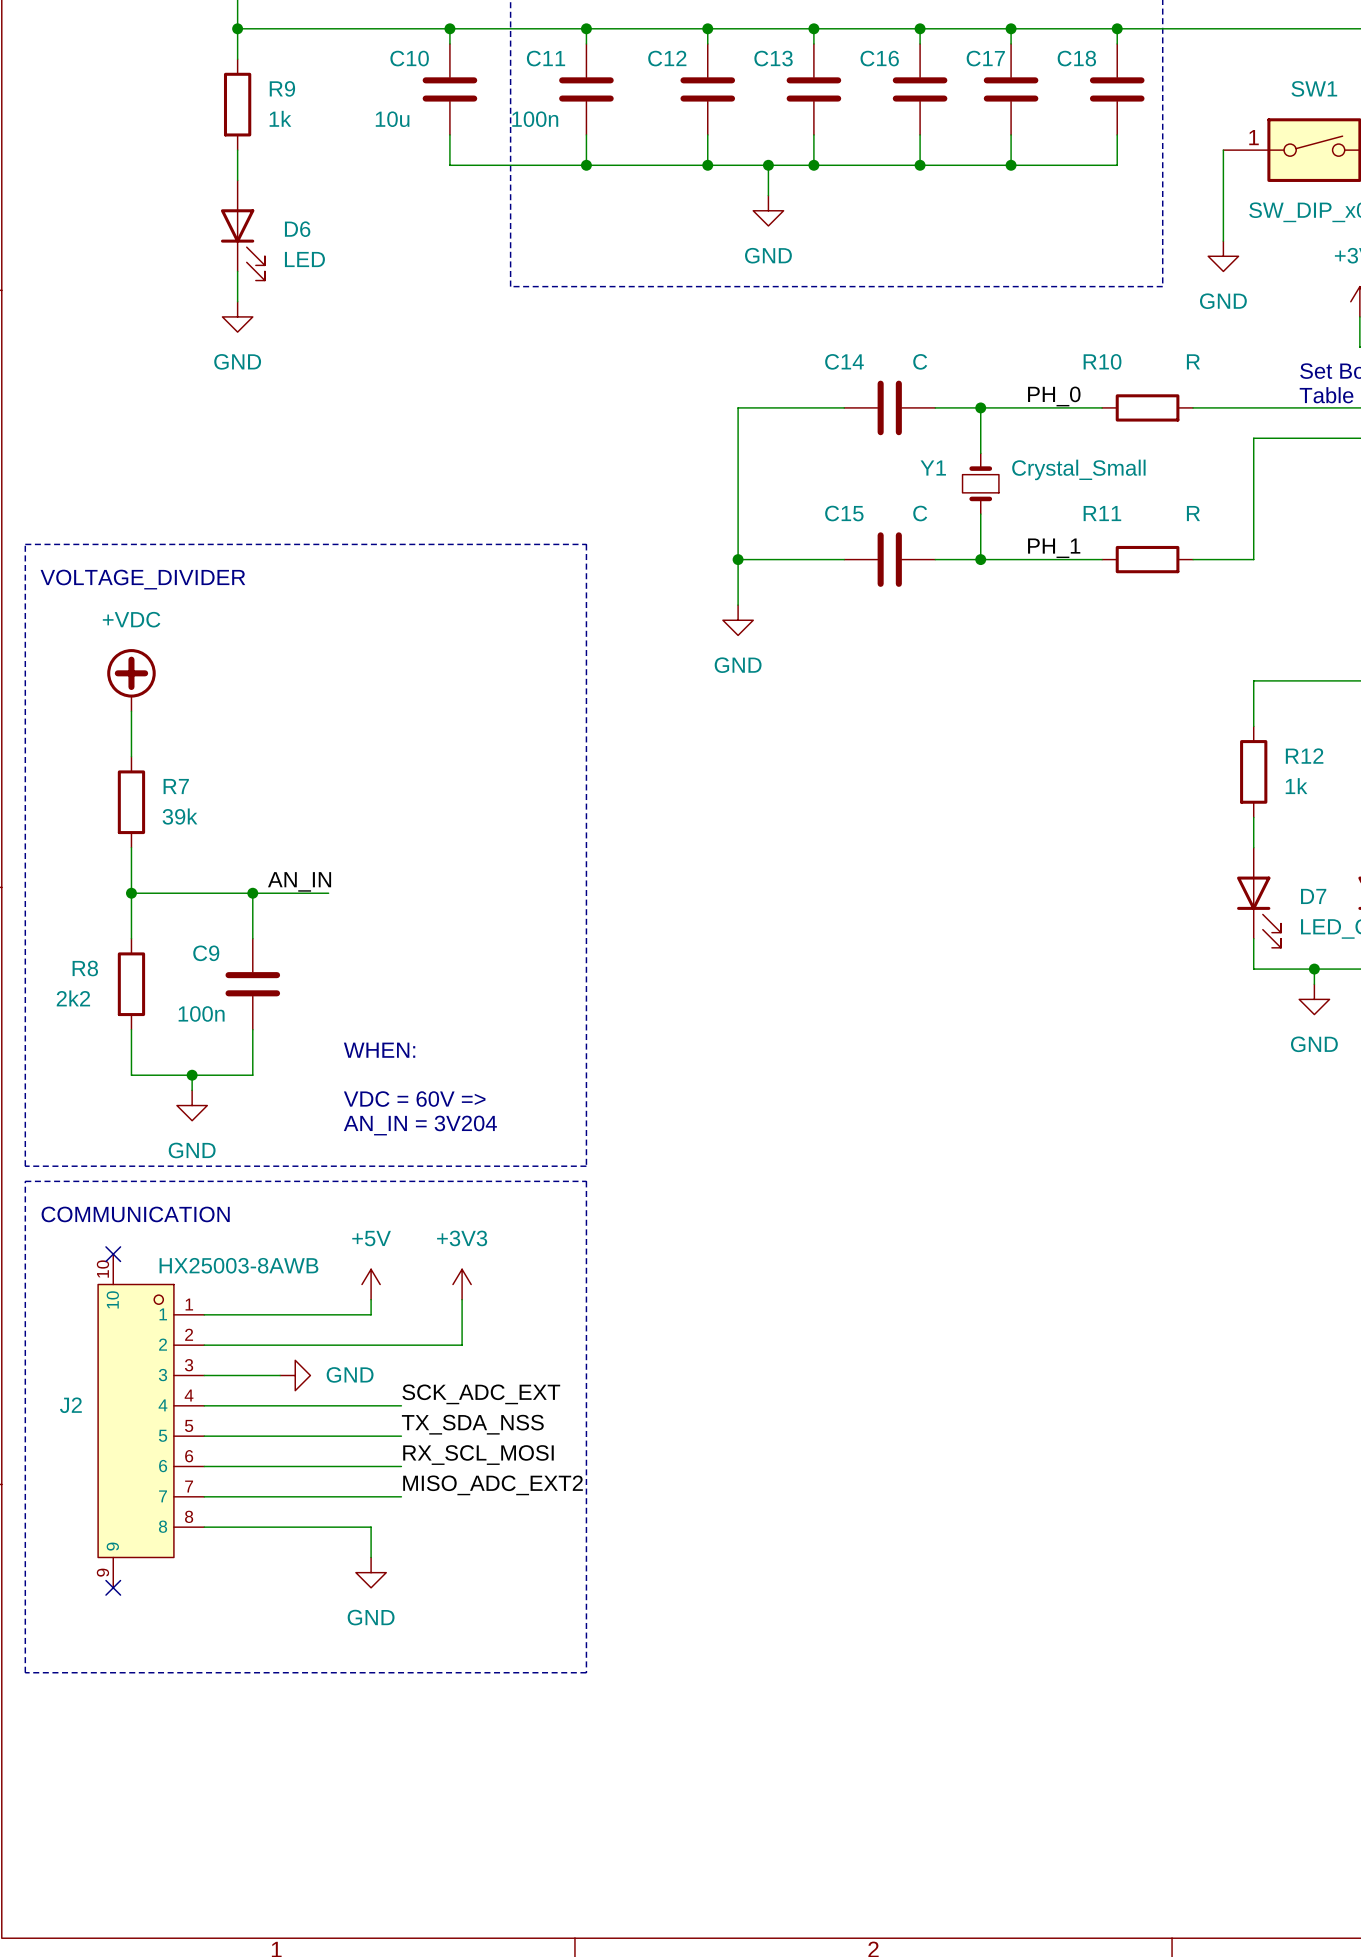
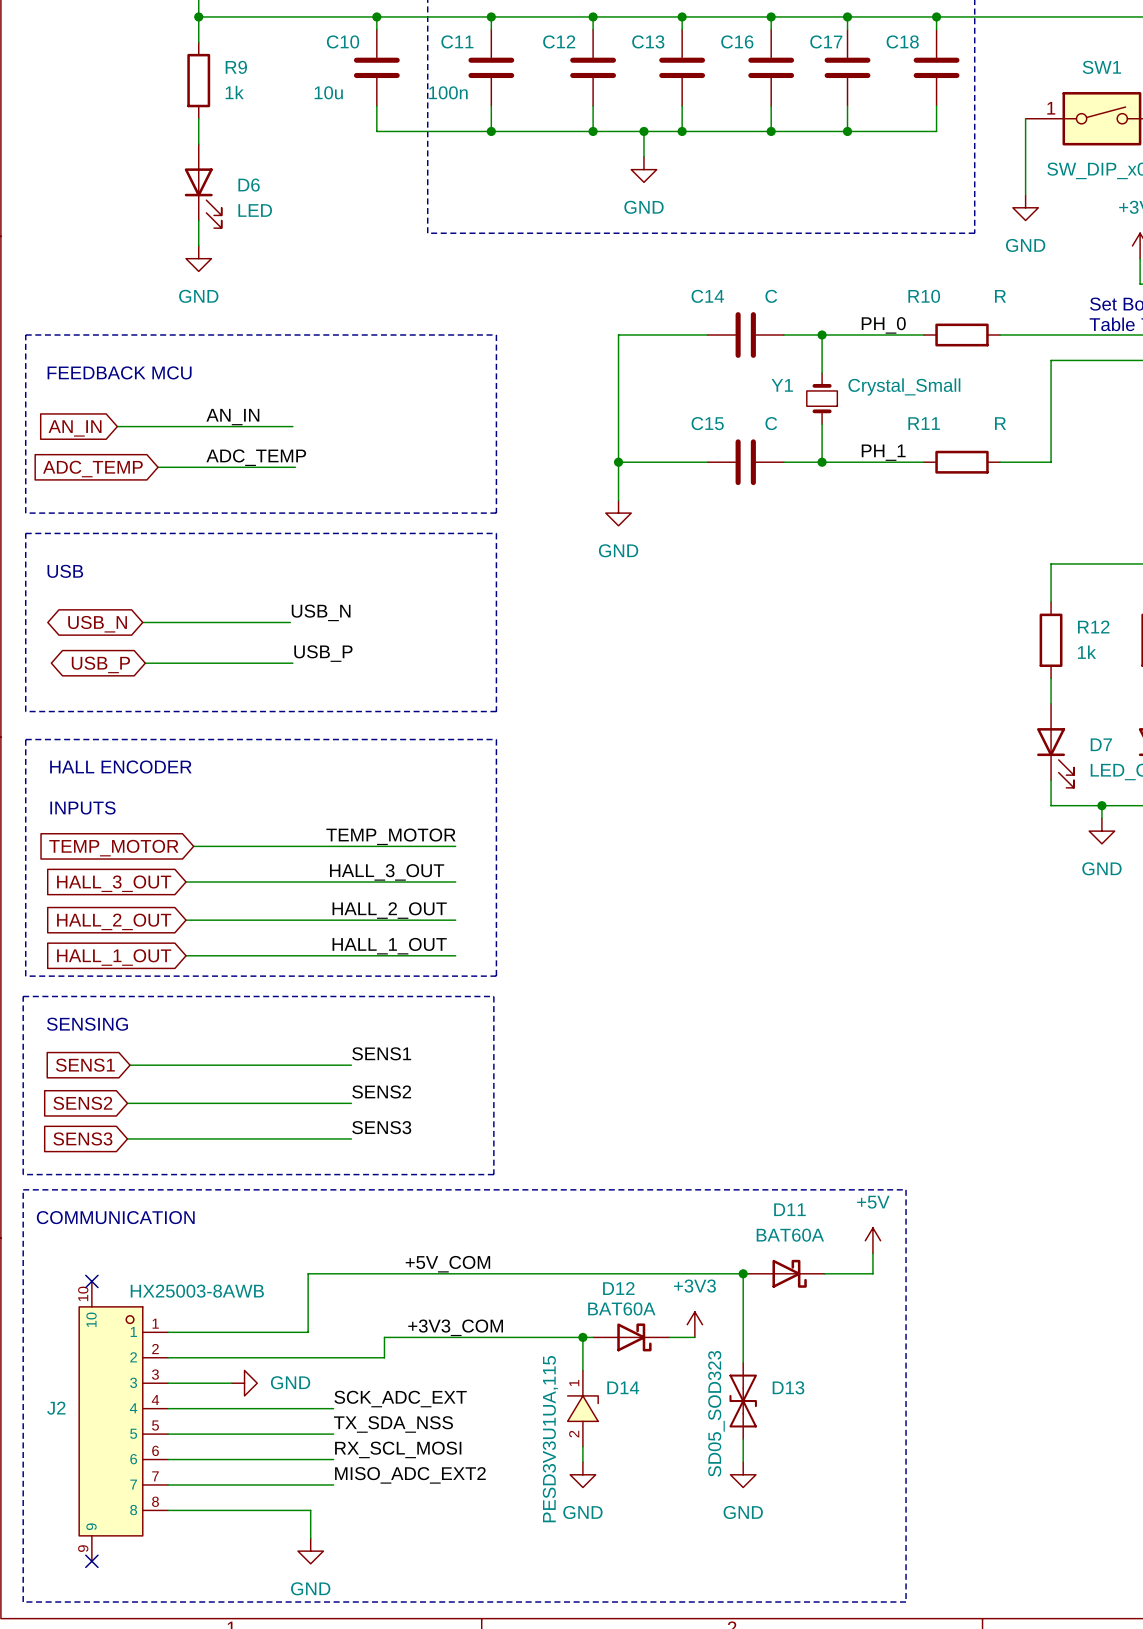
line: none -> (25, 335) (496, 335) (496, 513) (25, 513) (25, 335)
text: none -> FEEDBACK MCU (119, 372)
label: none -> AN_IN (232, 417)
wire: none -> (117, 426) (292, 426)
global label: none -> AN_IN (75, 428)
line: (25, 544) (586, 544) (586, 1166) (25, 1166) (25, 544) -> none
label: none -> ADC_TEMP (256, 457)
wire: none -> (158, 467) (295, 467)
global label: none -> ADC_TEMP (92, 469)
text: VOLTAGE_DIVIDER (142, 579) -> none
line: none -> (25, 533) (25, 711) (496, 711) (496, 533) (25, 533)
power symbol: +VDC (131, 680) -> none
text: none -> USB (65, 571)
wire: (131, 711) (131, 756) -> none
label: none -> USB_N (321, 612)
wire: none -> (142, 622) (290, 622)
global label: none -> USB_N (97, 624)
label: none -> USB_P (323, 653)
wire: none -> (145, 663) (292, 663)
global label: none -> USB_P (100, 664)
R7: 39k (131, 802) -> none
wire: (131, 847) (131, 938) -> none
label: AN_IN (299, 881) -> none
line: none -> (25, 739) (25, 976) (496, 976) (496, 739) (25, 739)
wire: (131, 893) (328, 893) -> none
junction: (131, 893) -> none
wire: (252, 893) (252, 938) -> none
junction: (252, 893) -> none
text: none -> HALL ENCODER (120, 767)
text: none -> INPUTS (82, 807)
R8: 2k2 (131, 984) -> none
C9: 100n (252, 984) -> none
label: none -> TEMP_MOTOR (390, 836)
wire: none -> (193, 846) (455, 846)
global label: none -> TEMP_MOTOR (113, 848)
wire: (131, 1029) (131, 1075) (252, 1075) (252, 1029) -> none
label: none -> HALL_3_OUT (387, 872)
text: WHEN: (379, 1050) -> none
wire: none -> (186, 882) (455, 882)
global label: none -> HALL_3_OUT (114, 883)
wire: (192, 1075) (192, 1090) -> none
junction: (192, 1075) -> none
label: none -> HALL_2_OUT (389, 910)
text: VDC = 60V => (414, 1099) -> none
power symbol: GND (192, 1105) -> none
wire: none -> (186, 920) (455, 920)
global label: none -> HALL_2_OUT (114, 921)
text: AN_IN = 3V204 (420, 1125) -> none
label: none -> HALL_1_OUT (389, 946)
wire: none -> (186, 955) (455, 955)
global label: none -> HALL_1_OUT (114, 957)
line: (25, 1181) (25, 1672) (586, 1672) (586, 1181) (25, 1181) -> none
line: none -> (23, 996) (493, 996) (493, 1174) (23, 1174) (23, 996)
text position: COMMUNICATION (135, 1214) -> COMMUNICATION (115, 1217)
text: none -> SENSING (87, 1024)
no-connect mark: (113, 1254) -> none
label: none -> SENS1 (381, 1053)
global label: none -> SENS1 (85, 1065)
wire: none -> (130, 1065) (351, 1065)
power symbol: +5V (371, 1284) -> none
power symbol: +3V3 (462, 1284) -> none
wire: (371, 1299) (371, 1314) (204, 1314) -> none
wire: (462, 1299) (462, 1345) (204, 1345) -> none
label: none -> SENS2 (381, 1091)
global label: none -> SENS2 (82, 1103)
wire: none -> (127, 1103) (351, 1103)
label: none -> SENS3 (381, 1127)
global label: none -> SENS3 (82, 1138)
wire: none -> (127, 1138) (351, 1138)
wire: (204, 1375) (280, 1375) -> (168, 1383) (231, 1383)
power symbol: GND (295, 1375) -> none
label position: SCK_ADC_EXT (481, 1394) -> SCK_ADC_EXT (400, 1399)
wire: (204, 1405) (401, 1405) -> (168, 1408) (333, 1408)
J2 position: (151, 1420) -> (123, 1421)
label position: TX_SDA_NSS (472, 1424) -> TX_SDA_NSS (393, 1424)
line: none -> (23, 1189) (23, 1602) (906, 1602) (906, 1189) (23, 1189)
wire: (204, 1436) (401, 1436) -> (168, 1434) (333, 1434)
label position: RX_SCL_MOSI (478, 1455) -> RX_SCL_MOSI (398, 1449)
wire: (204, 1466) (401, 1466) -> (168, 1459) (333, 1459)
label position: MISO_ADC_EXT2 (493, 1485) -> MISO_ADC_EXT2 (410, 1475)
power symbol: none -> +5V (872, 1240)
wire: (204, 1496) (401, 1496) -> (168, 1484) (333, 1484)
wire: none -> (872, 1253) (872, 1273) (824, 1273)
label: none -> +5V_COM (447, 1264)
wire: (204, 1527) (368, 1527) -> (168, 1332) (308, 1332) (308, 1273)
wire: (371, 1527) (371, 1557) -> (310, 1273) (748, 1273)
wire: none -> (743, 1273) (743, 1362)
junction: none -> (743, 1273)
D11: none -> BAT60A (786, 1273)
power symbol rotation: 0° (371, 1572) -> 90° counterclockwise (244, 1383)
power symbol position: GND (371, 1572) -> GND (244, 1383)
no-connect mark position: (113, 1587) -> (91, 1281)
power symbol: none -> +3V3 (694, 1324)
label: none -> +3V3_COM (455, 1327)
wire: none -> (582, 1337) (582, 1370)
junction: none -> (582, 1337)
wire: none -> (593, 1337) (384, 1337) (384, 1357) (168, 1357)
D12: none -> BAT60A (631, 1337)
wire: none -> (669, 1337) (694, 1337)
D13: none -> SD05_SOD323 (743, 1401)
D14: none -> PESD3V3U1UA,115 (582, 1408)
wire: none -> (743, 1439) (743, 1462)
wire: none -> (582, 1446) (582, 1462)
power symbol: none -> GND (582, 1474)
power symbol: none -> GND (743, 1474)
wire: none -> (168, 1510) (310, 1510) (310, 1538)
power symbol: none -> GND (310, 1551)
no-connect mark: none -> (91, 1561)

